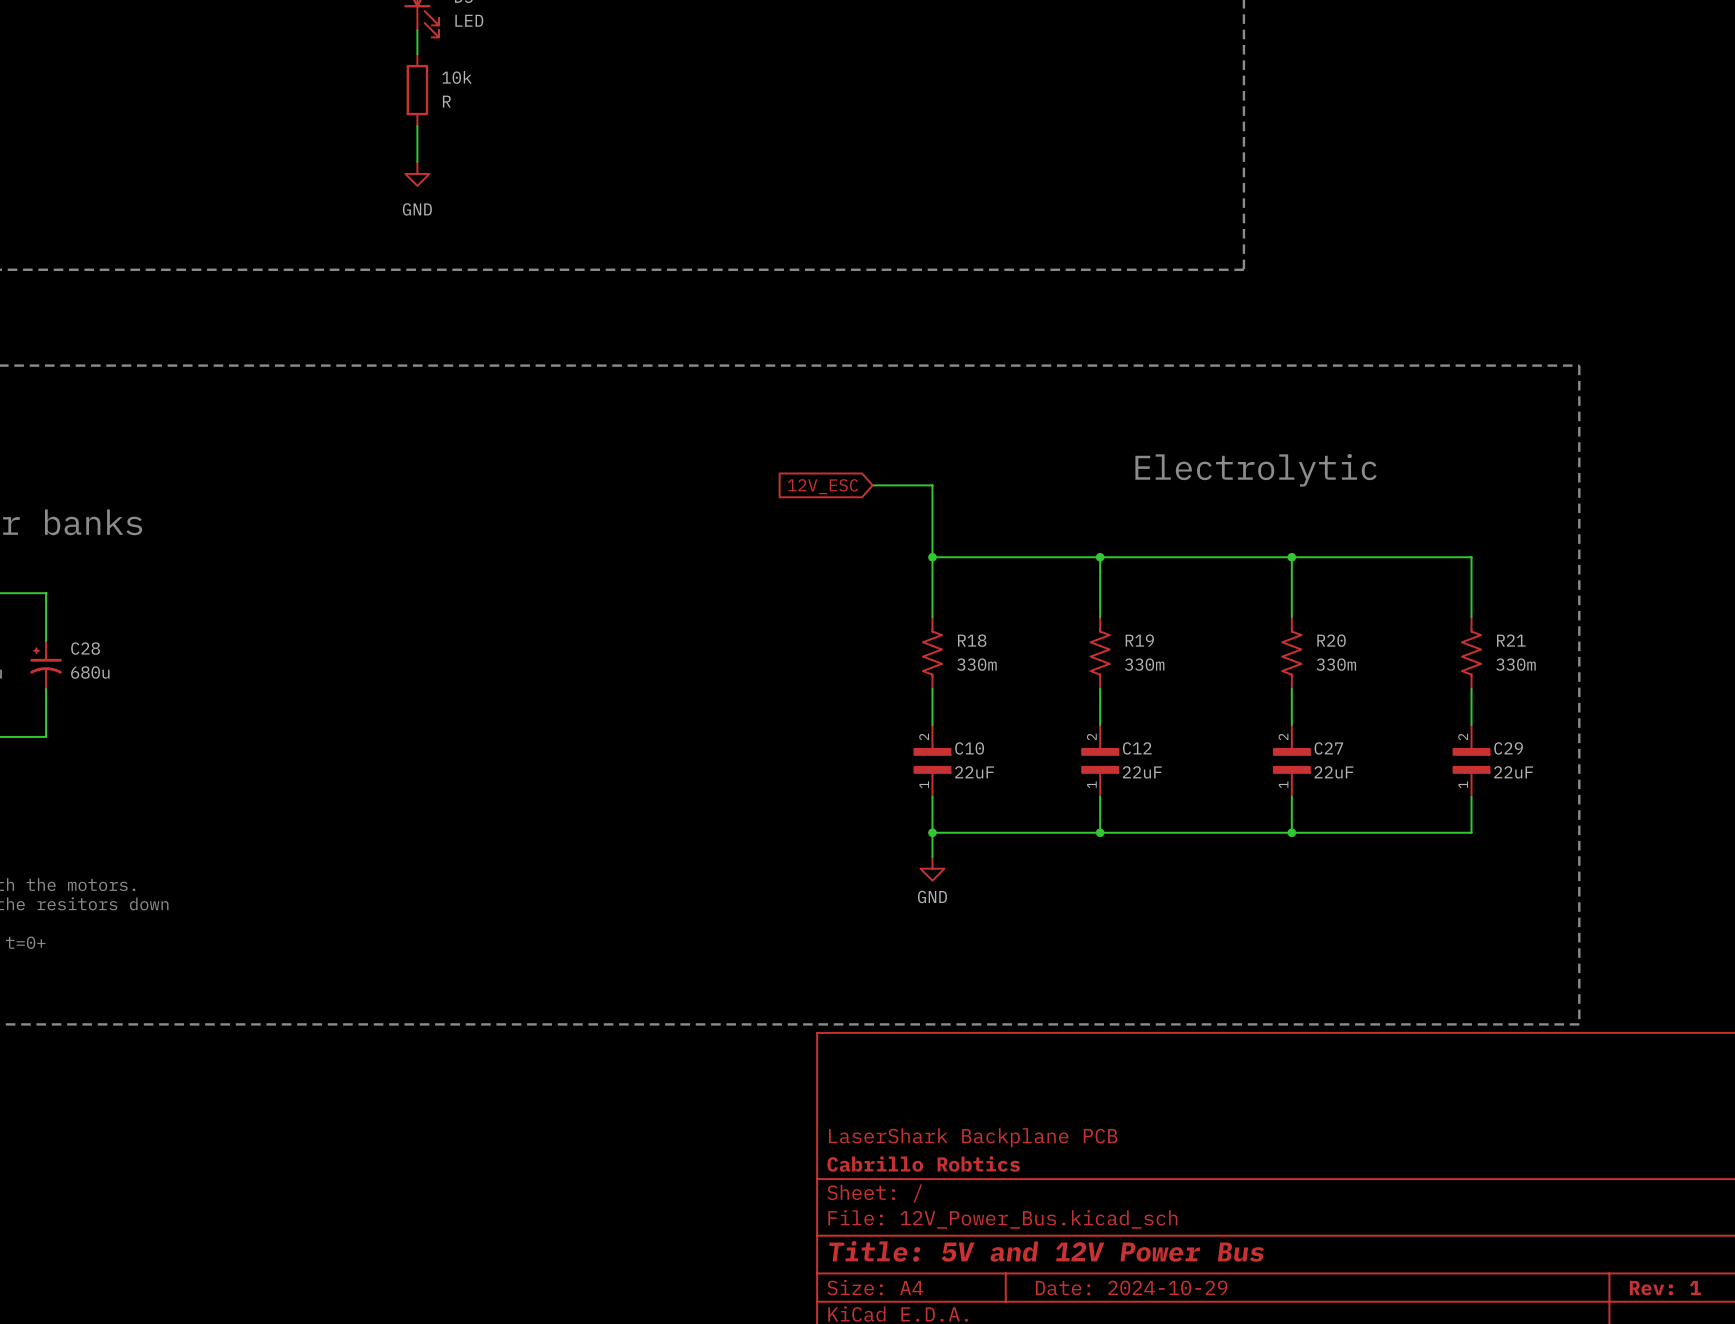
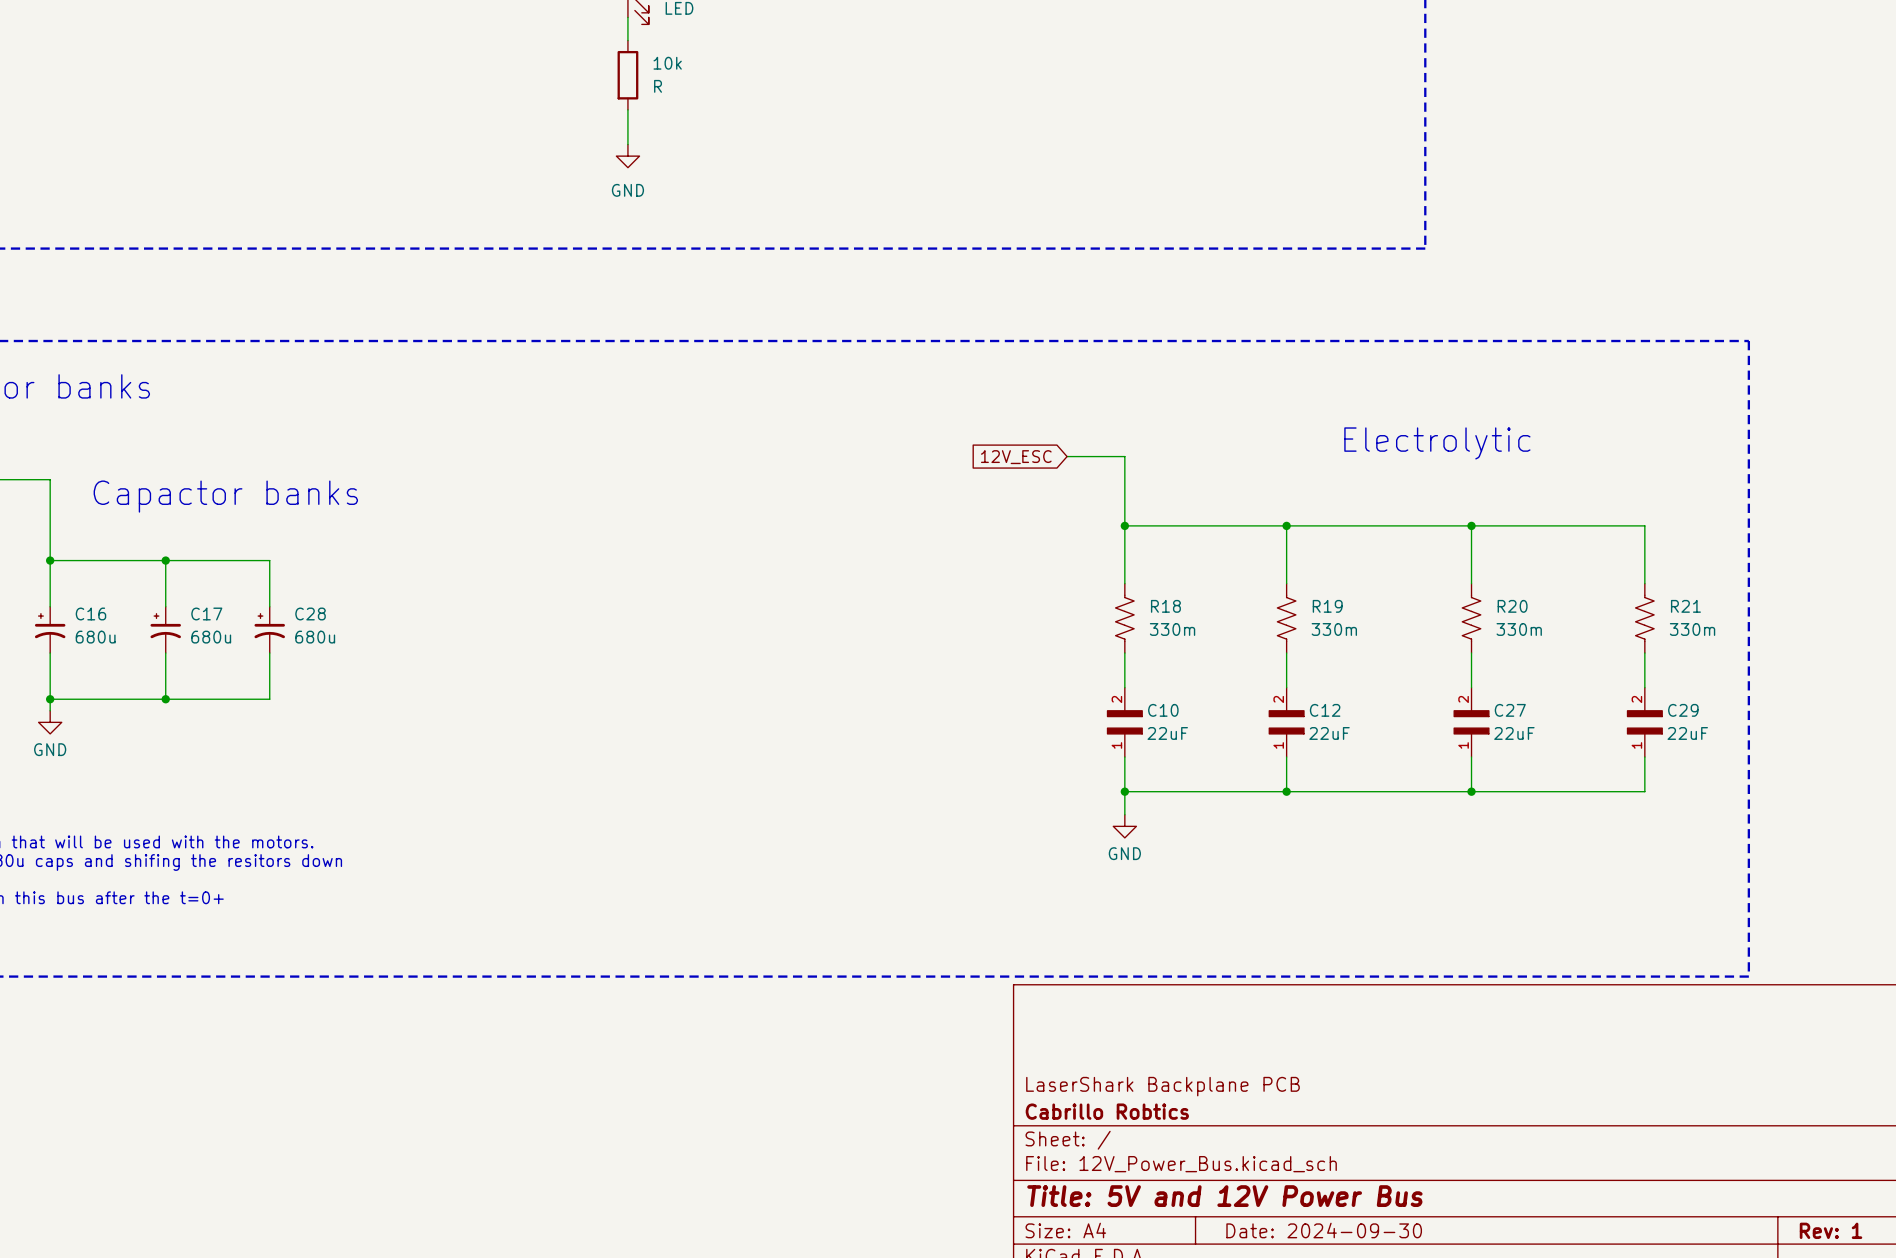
title block: Date: 2024-10-29 (1131, 1287) -> Date: 2024-09-30 (1324, 1230)

